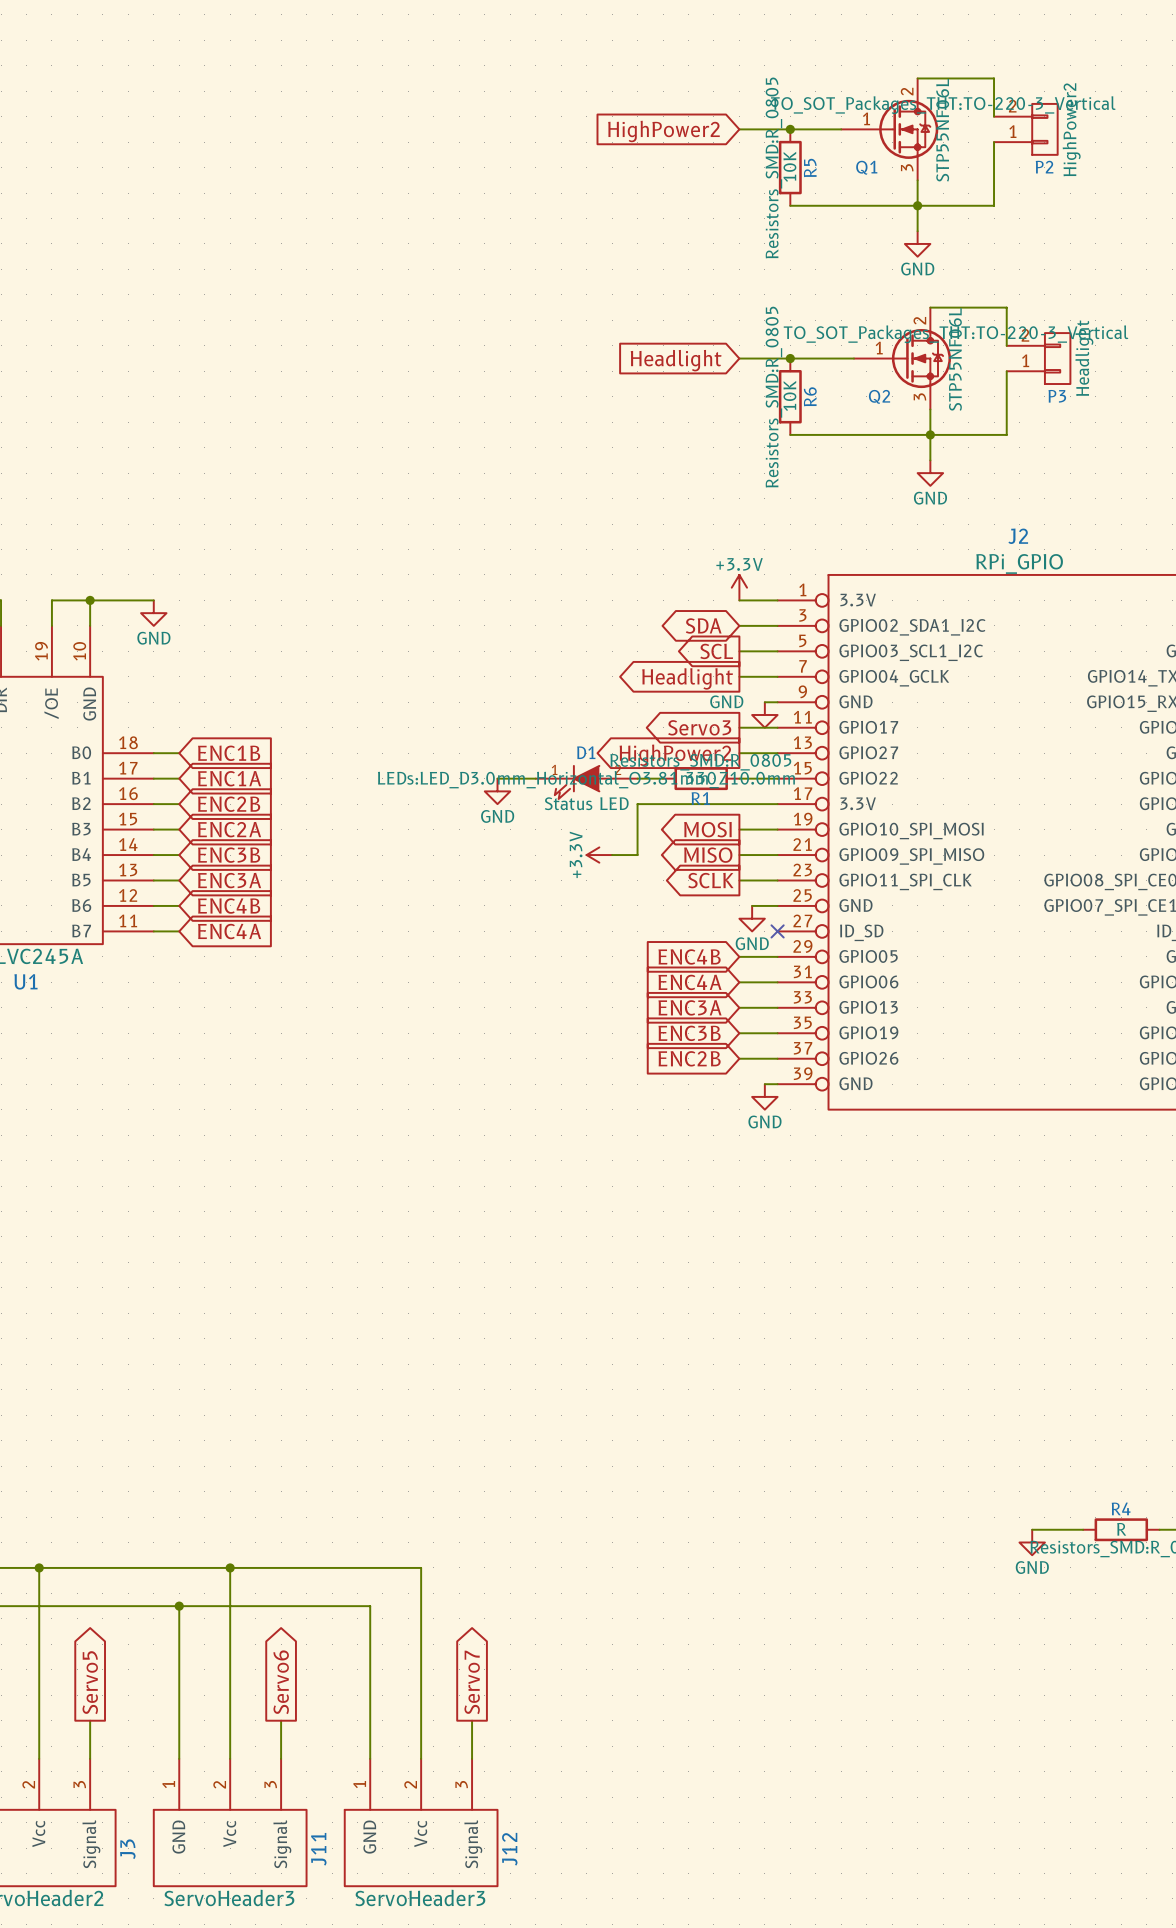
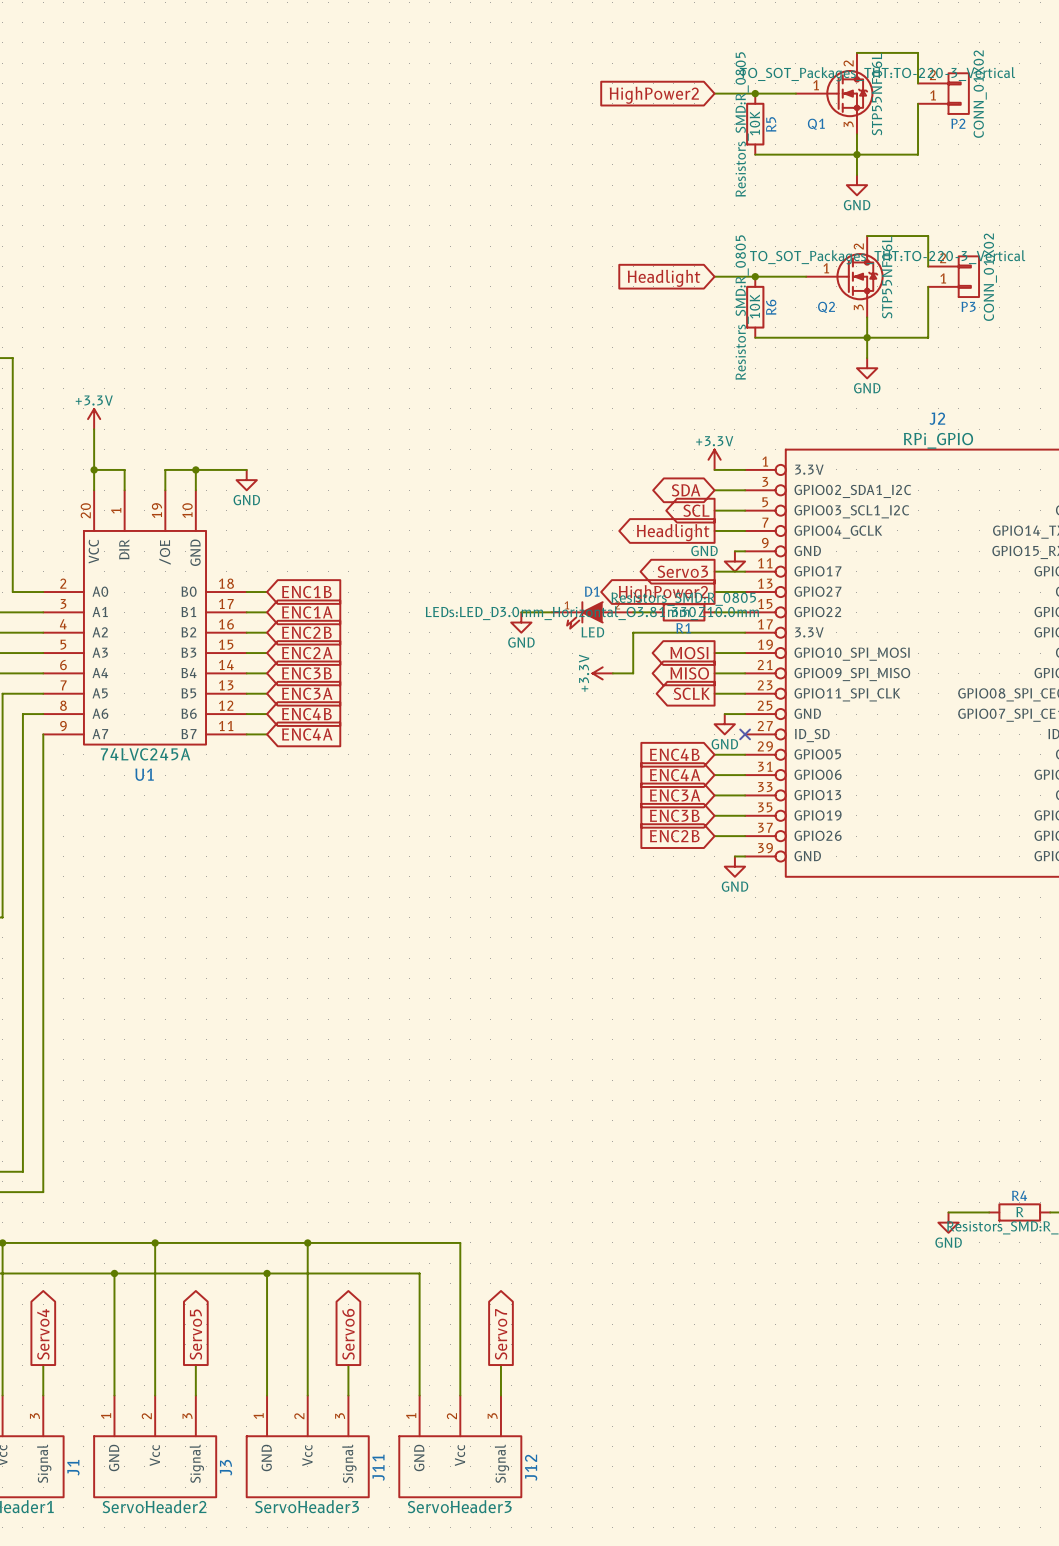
P2 value: HighPower2 (1071, 129) -> CONN_01X02 (980, 94)
P3 value: Headlight (1084, 358) -> CONN_01X02 (990, 277)
D1 value: Status LED (586, 803) -> LED (592, 632)

